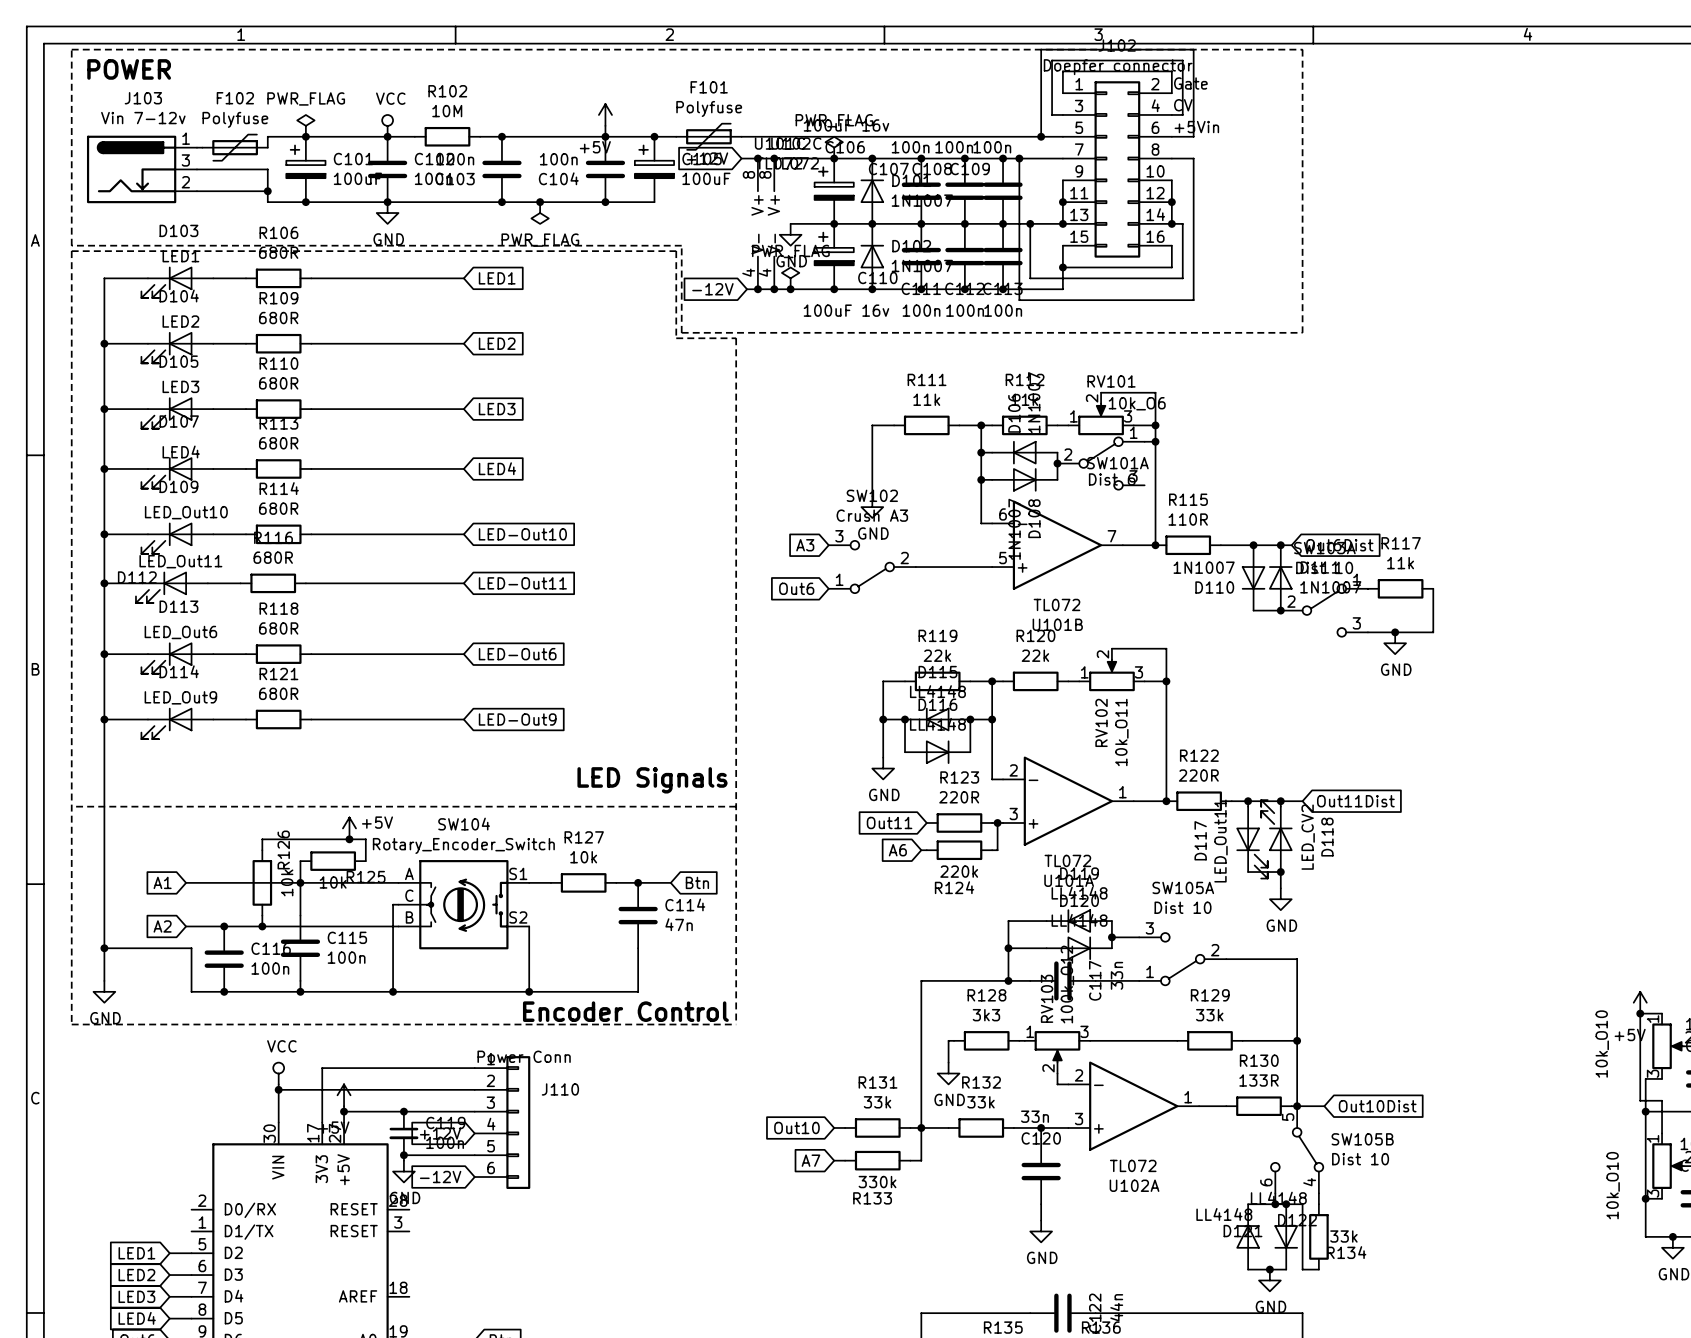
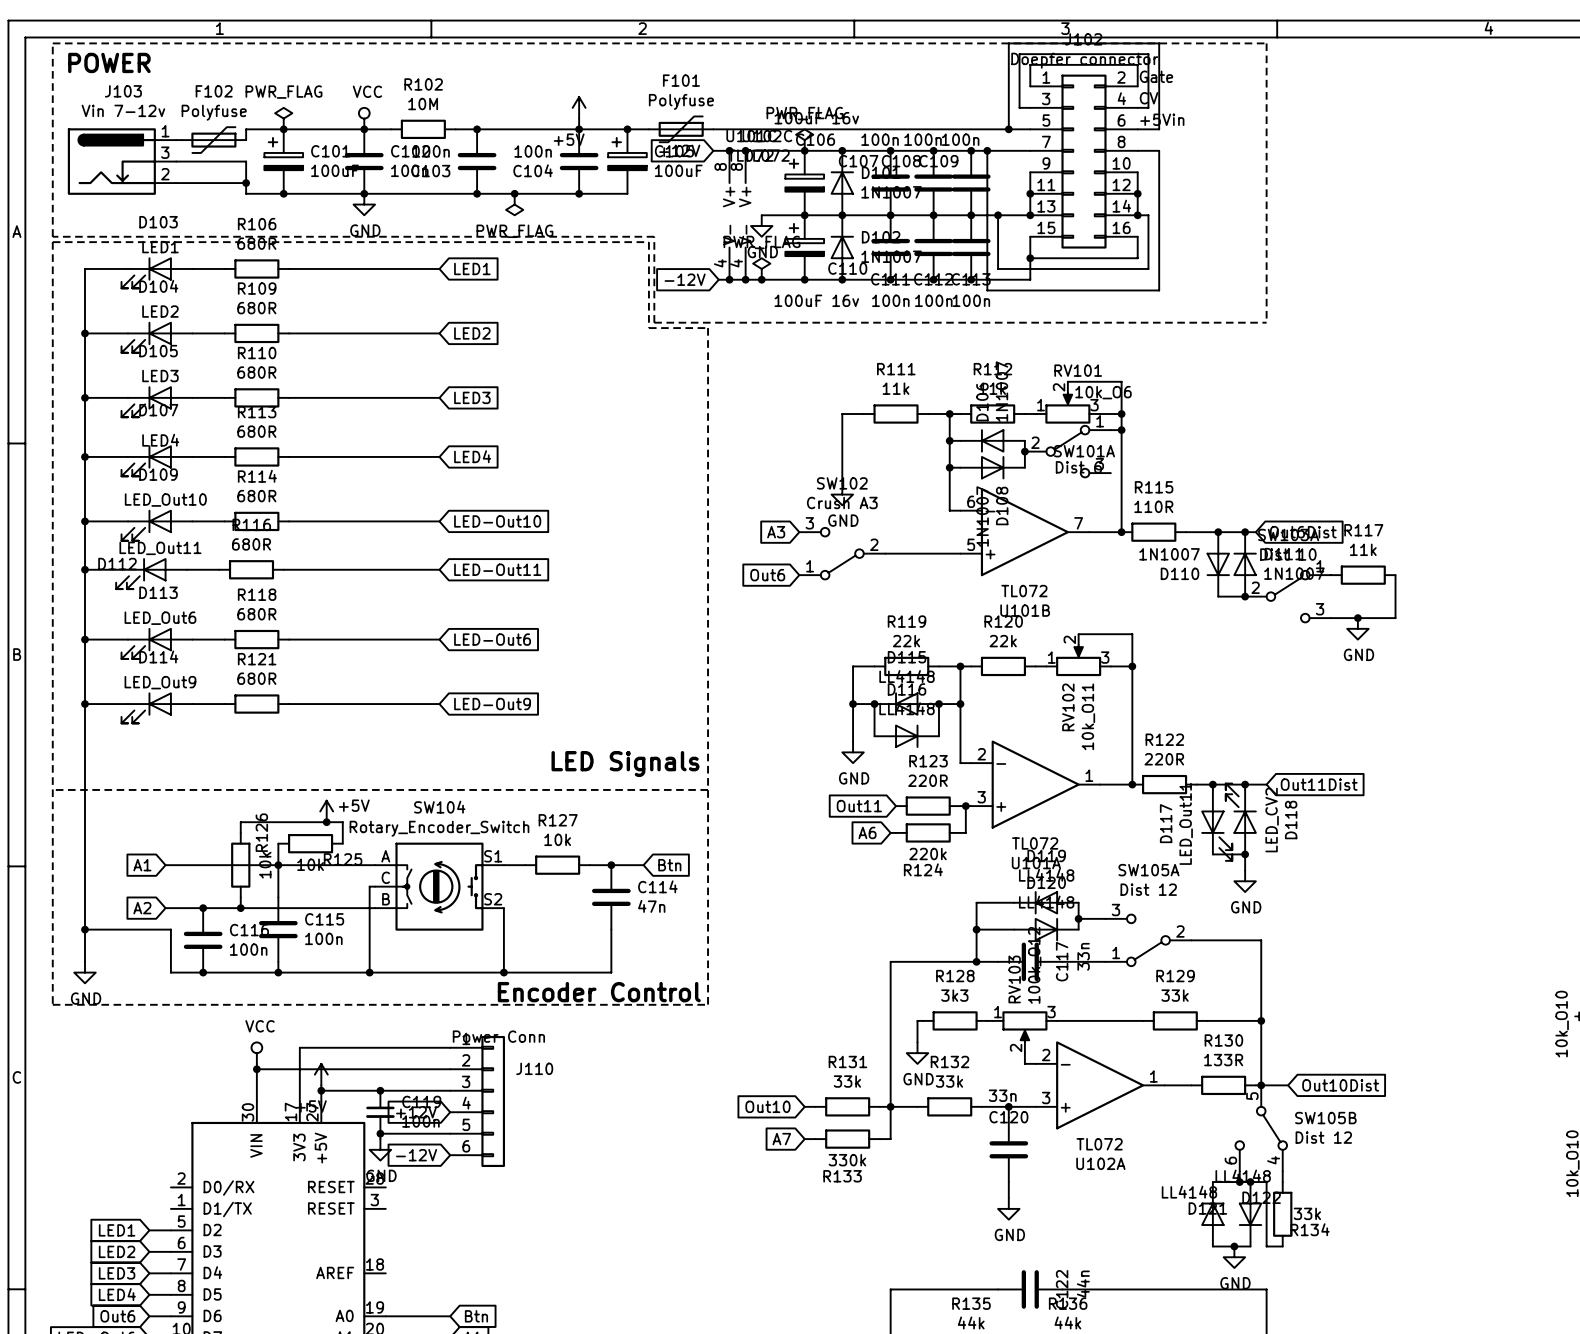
SW105A value: Dist 10 (1183, 907) -> Dist 12 (1148, 889)
SW105B value: Dist 10 (1360, 1159) -> Dist 12 (1323, 1137)

